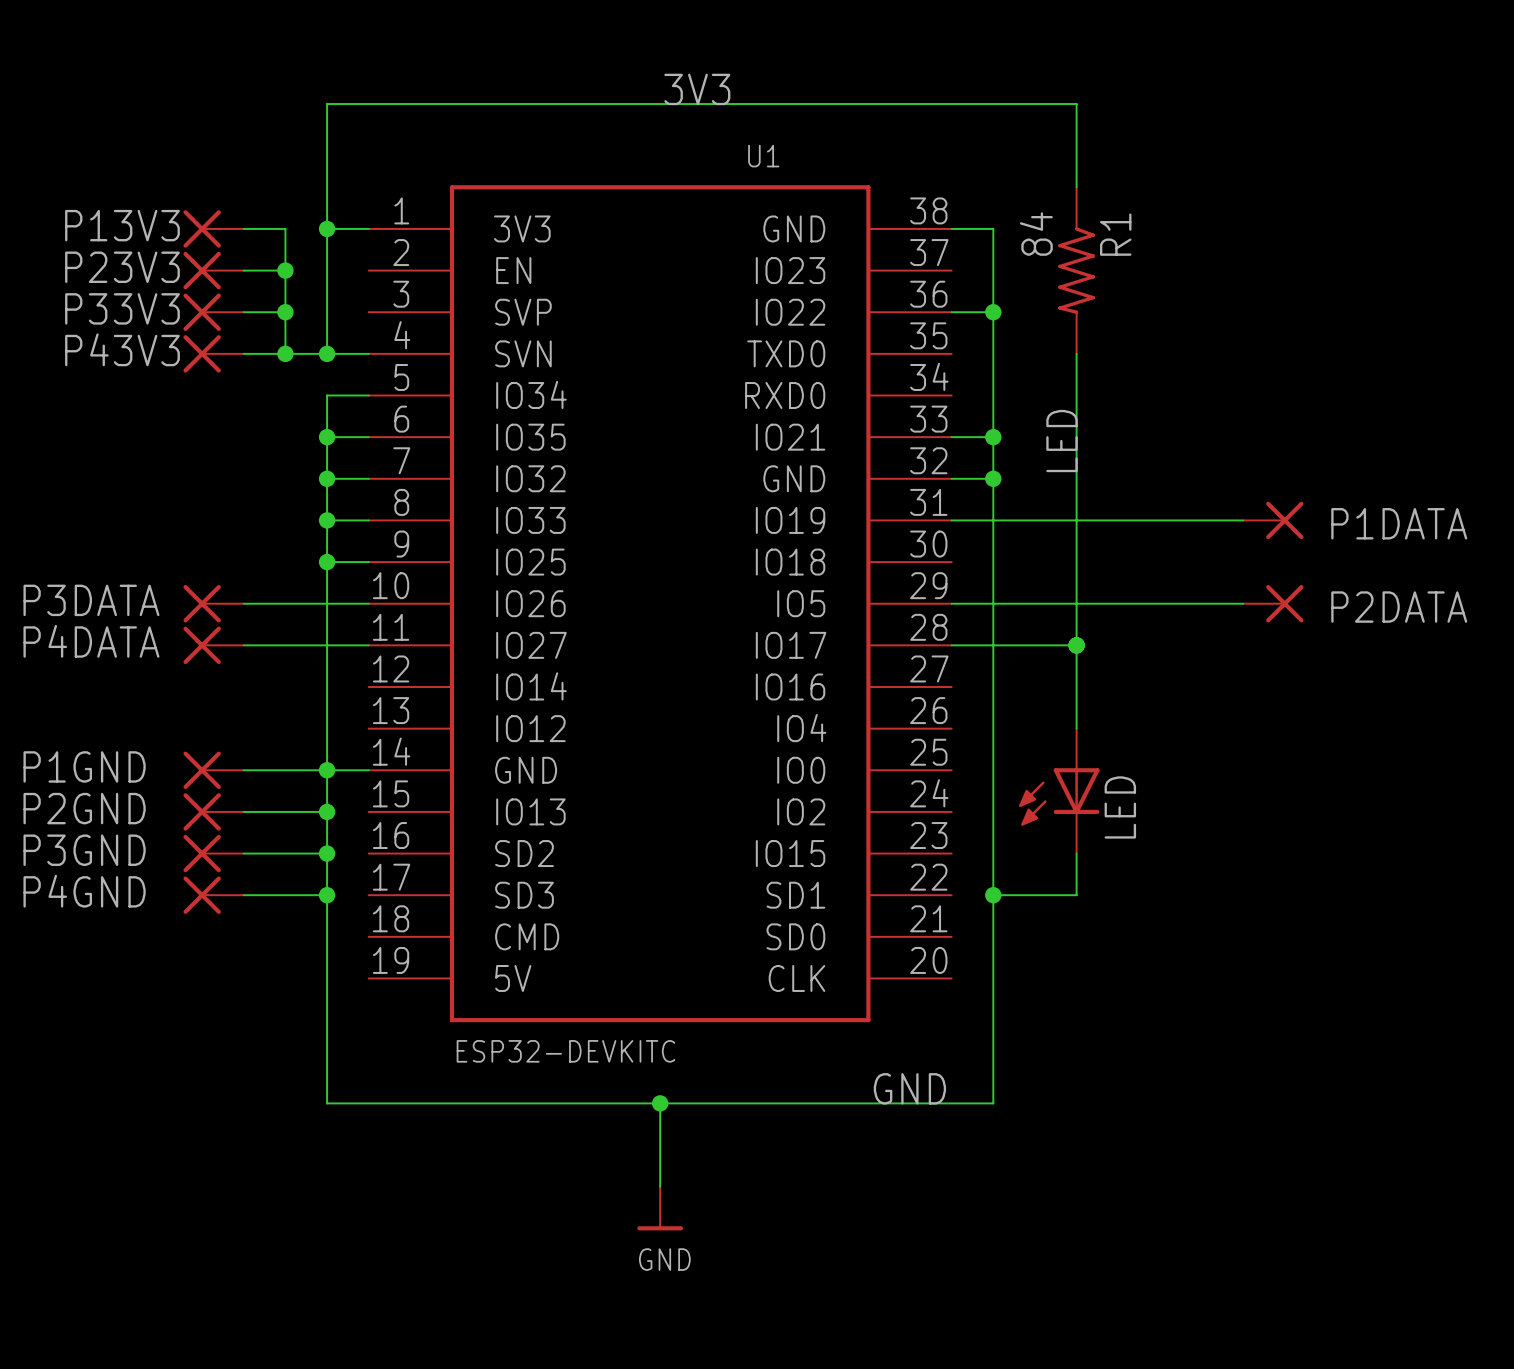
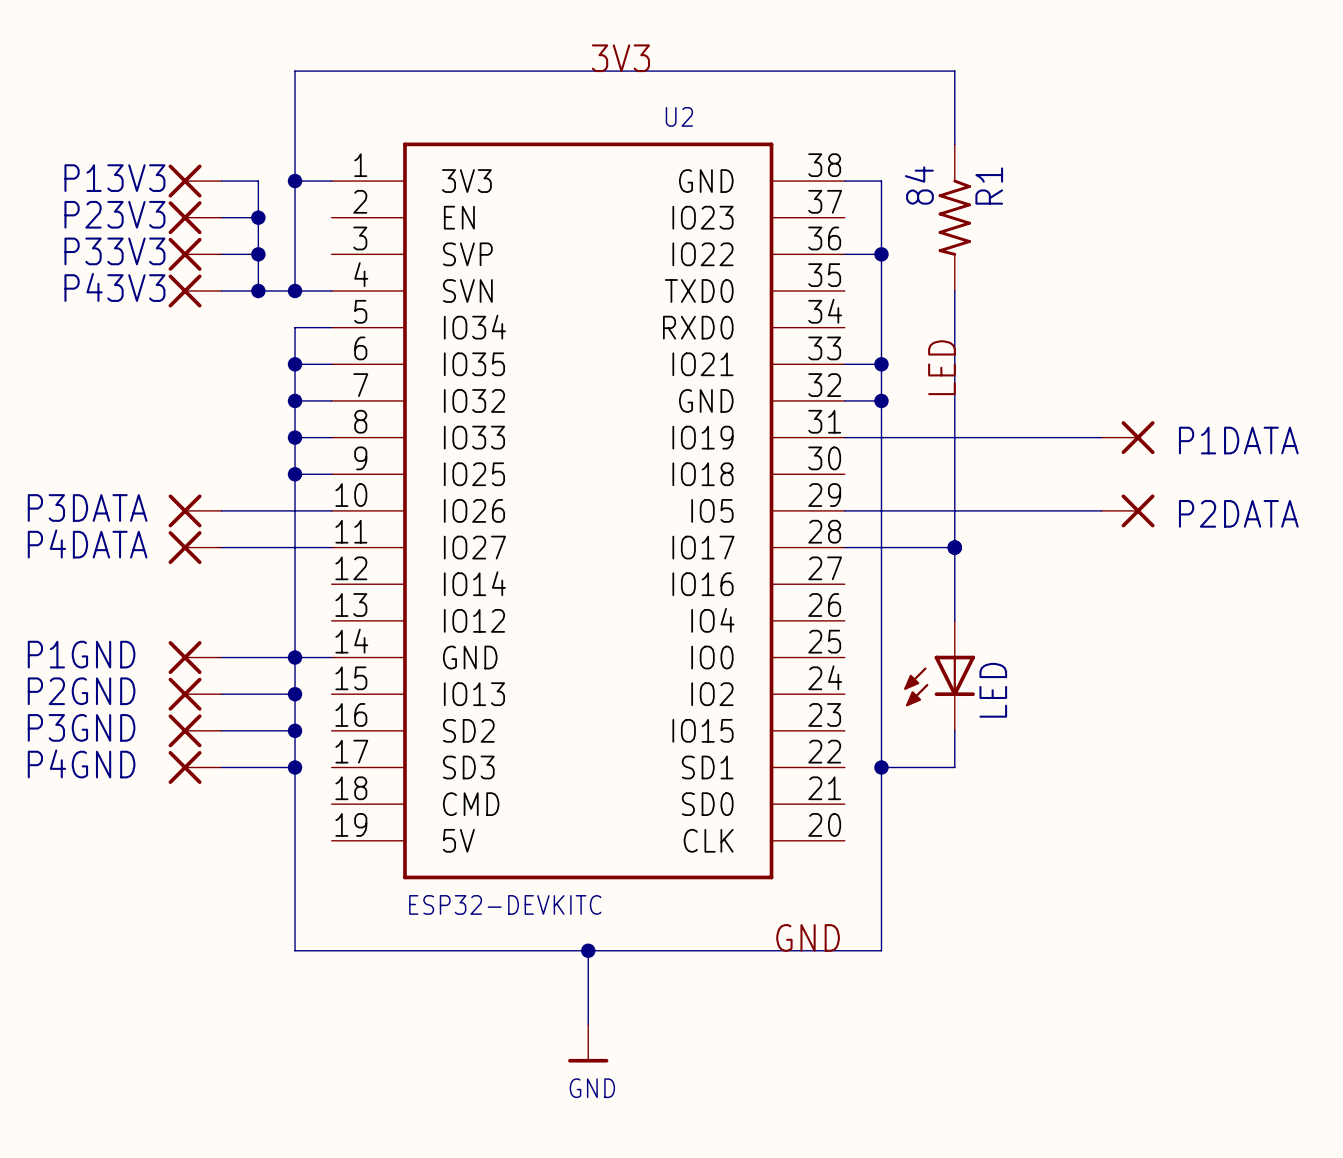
U1 name: U1 (763, 156) -> U2 (679, 116)

